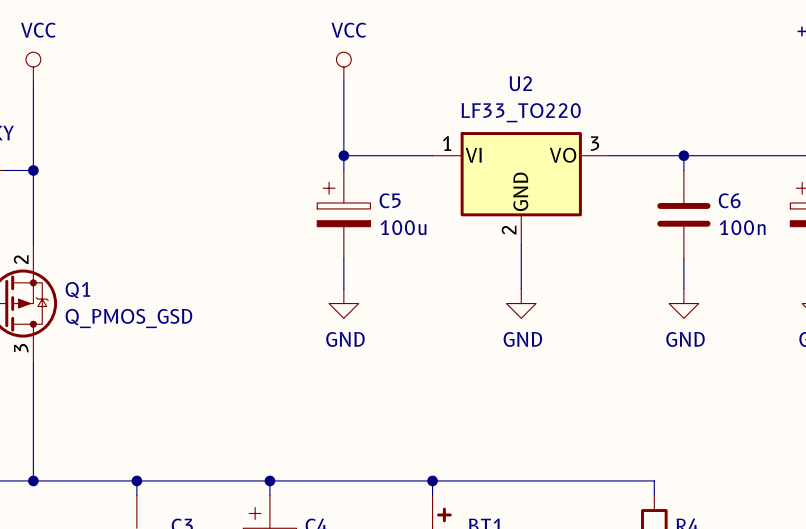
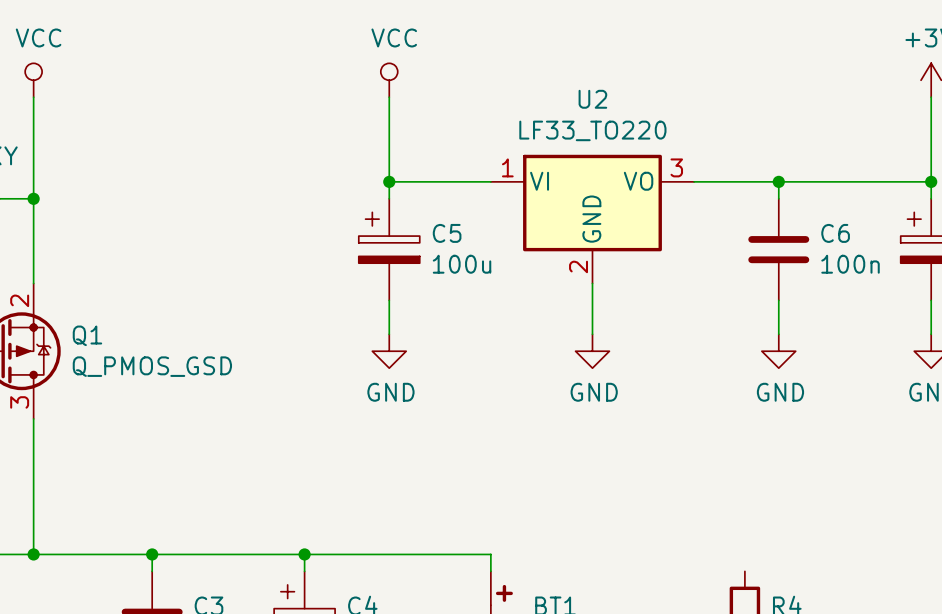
wire: (432, 480) (654, 480) (654, 495) -> none
junction: (432, 480) -> none

